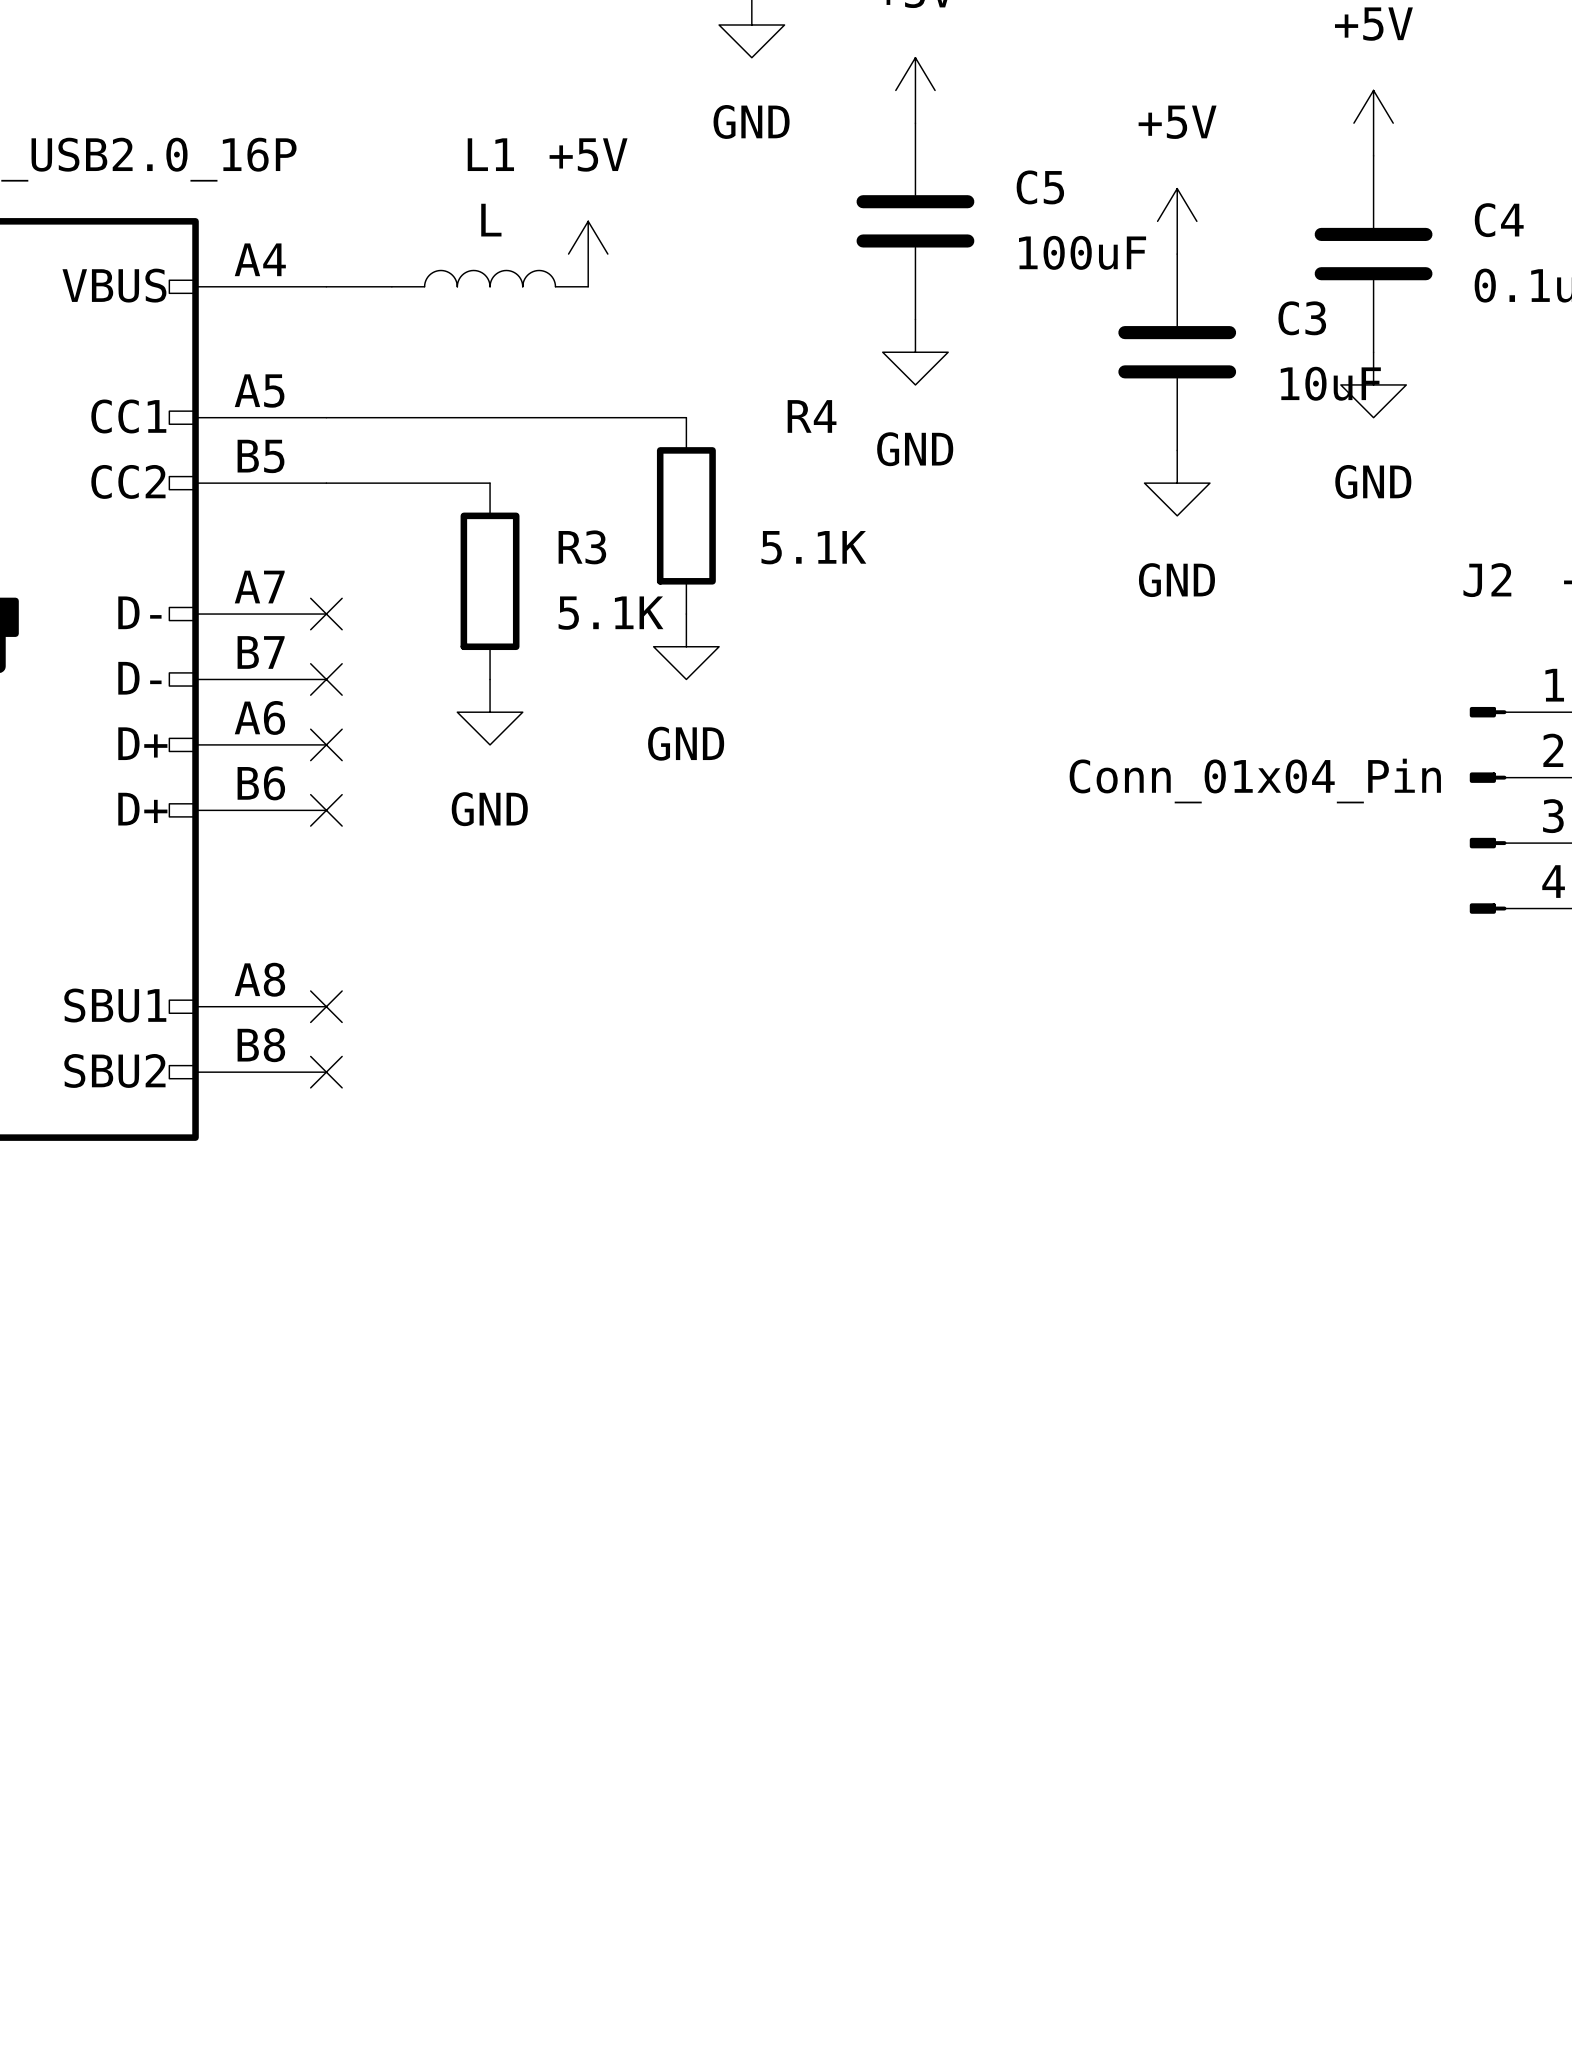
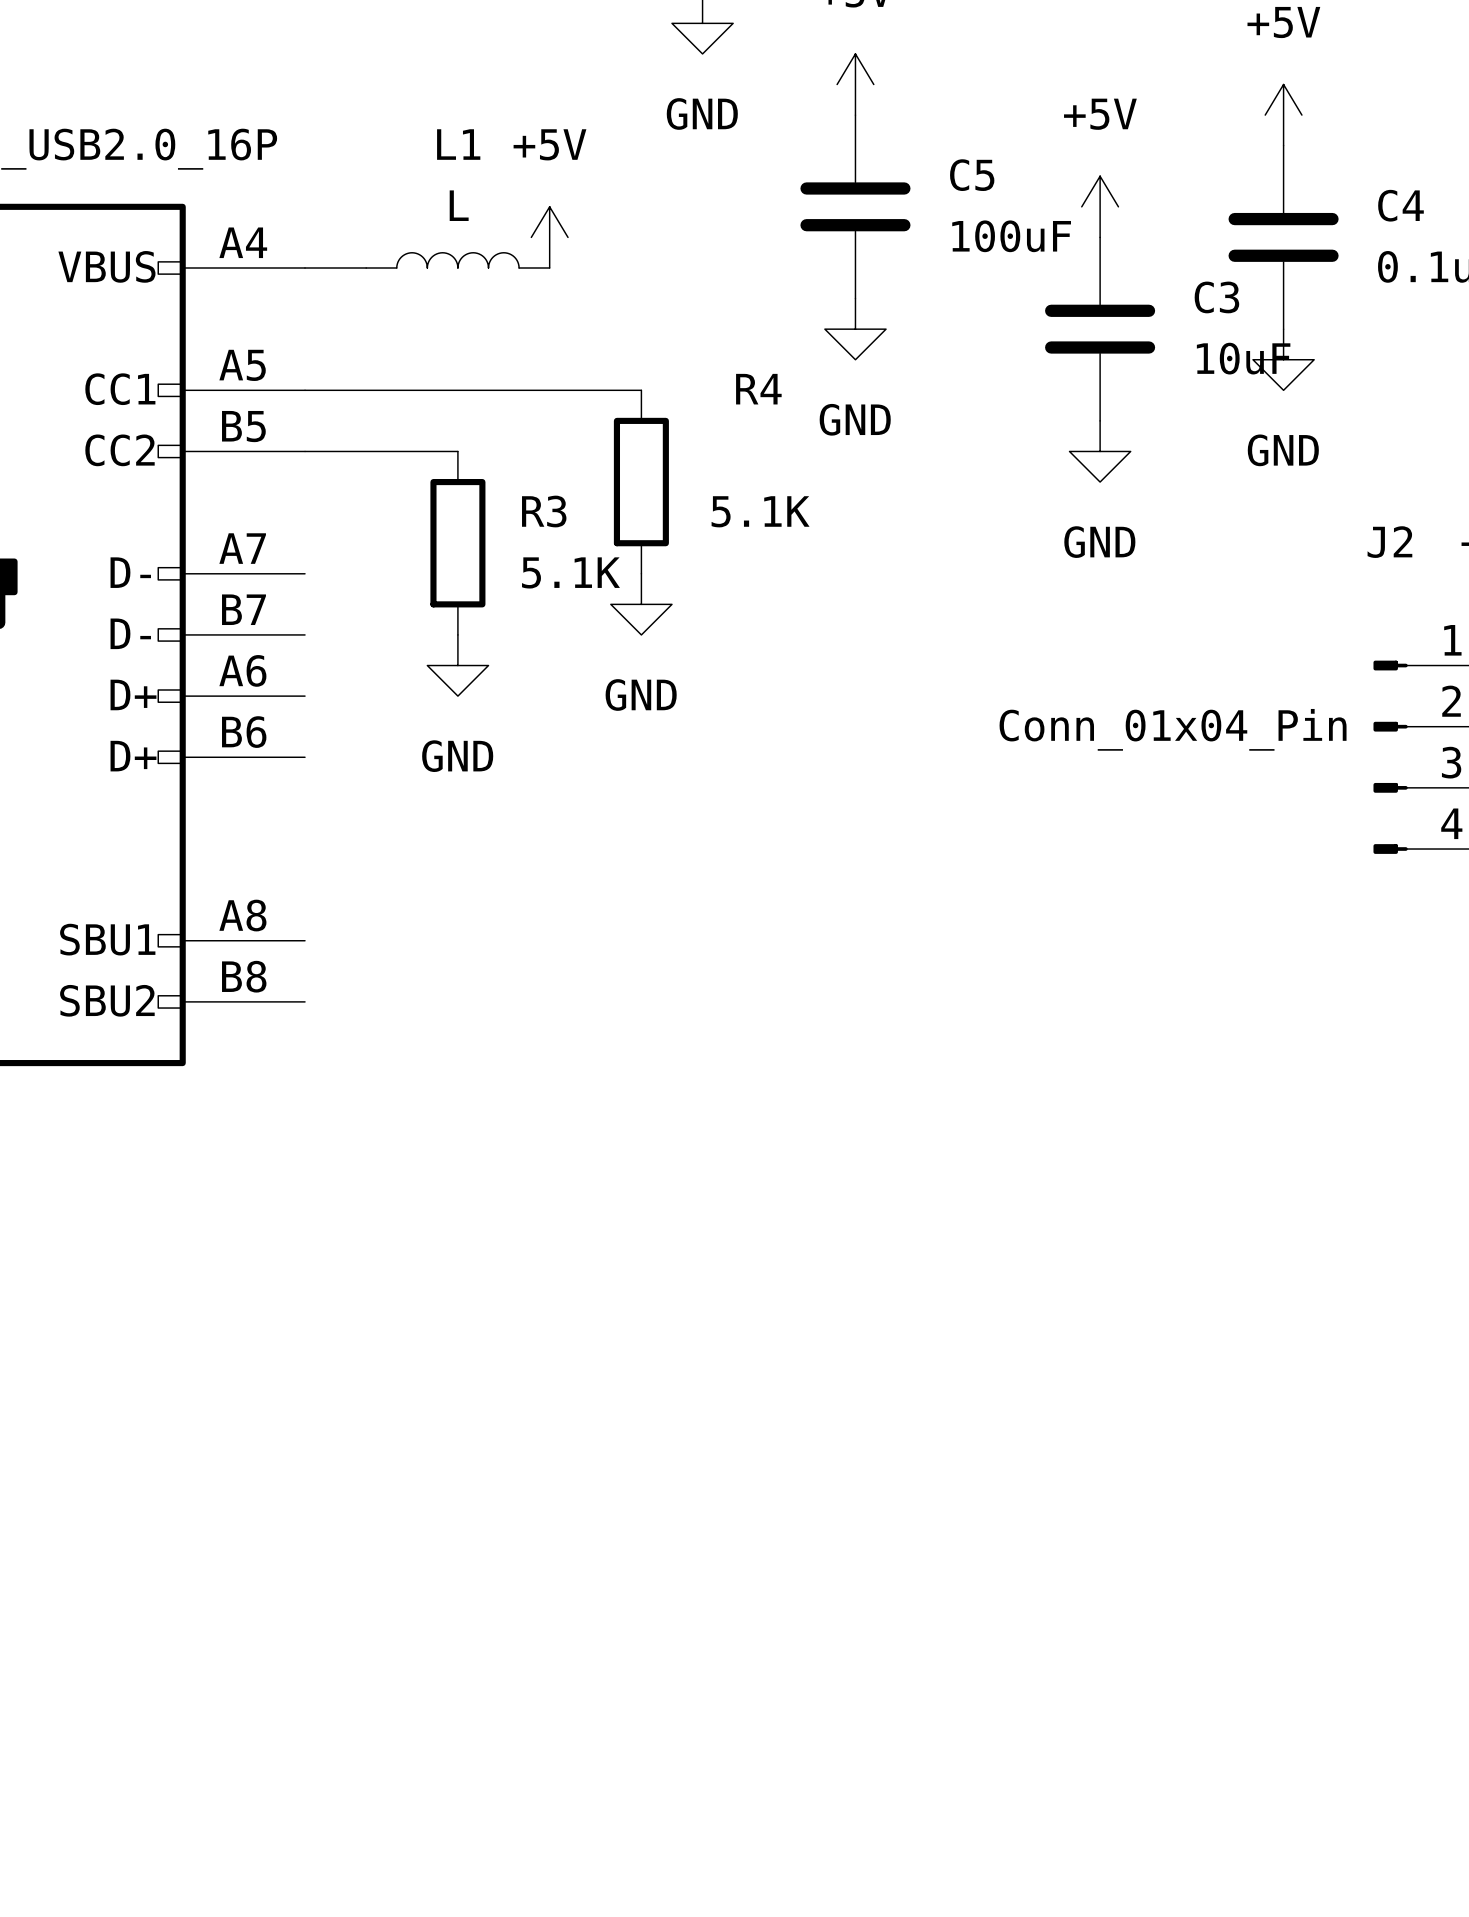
no-connect mark: (326, 614) -> none
no-connect mark: (326, 679) -> none
no-connect mark: (326, 744) -> none
no-connect mark: (326, 810) -> none
no-connect mark: (326, 1006) -> none
no-connect mark: (326, 1072) -> none

